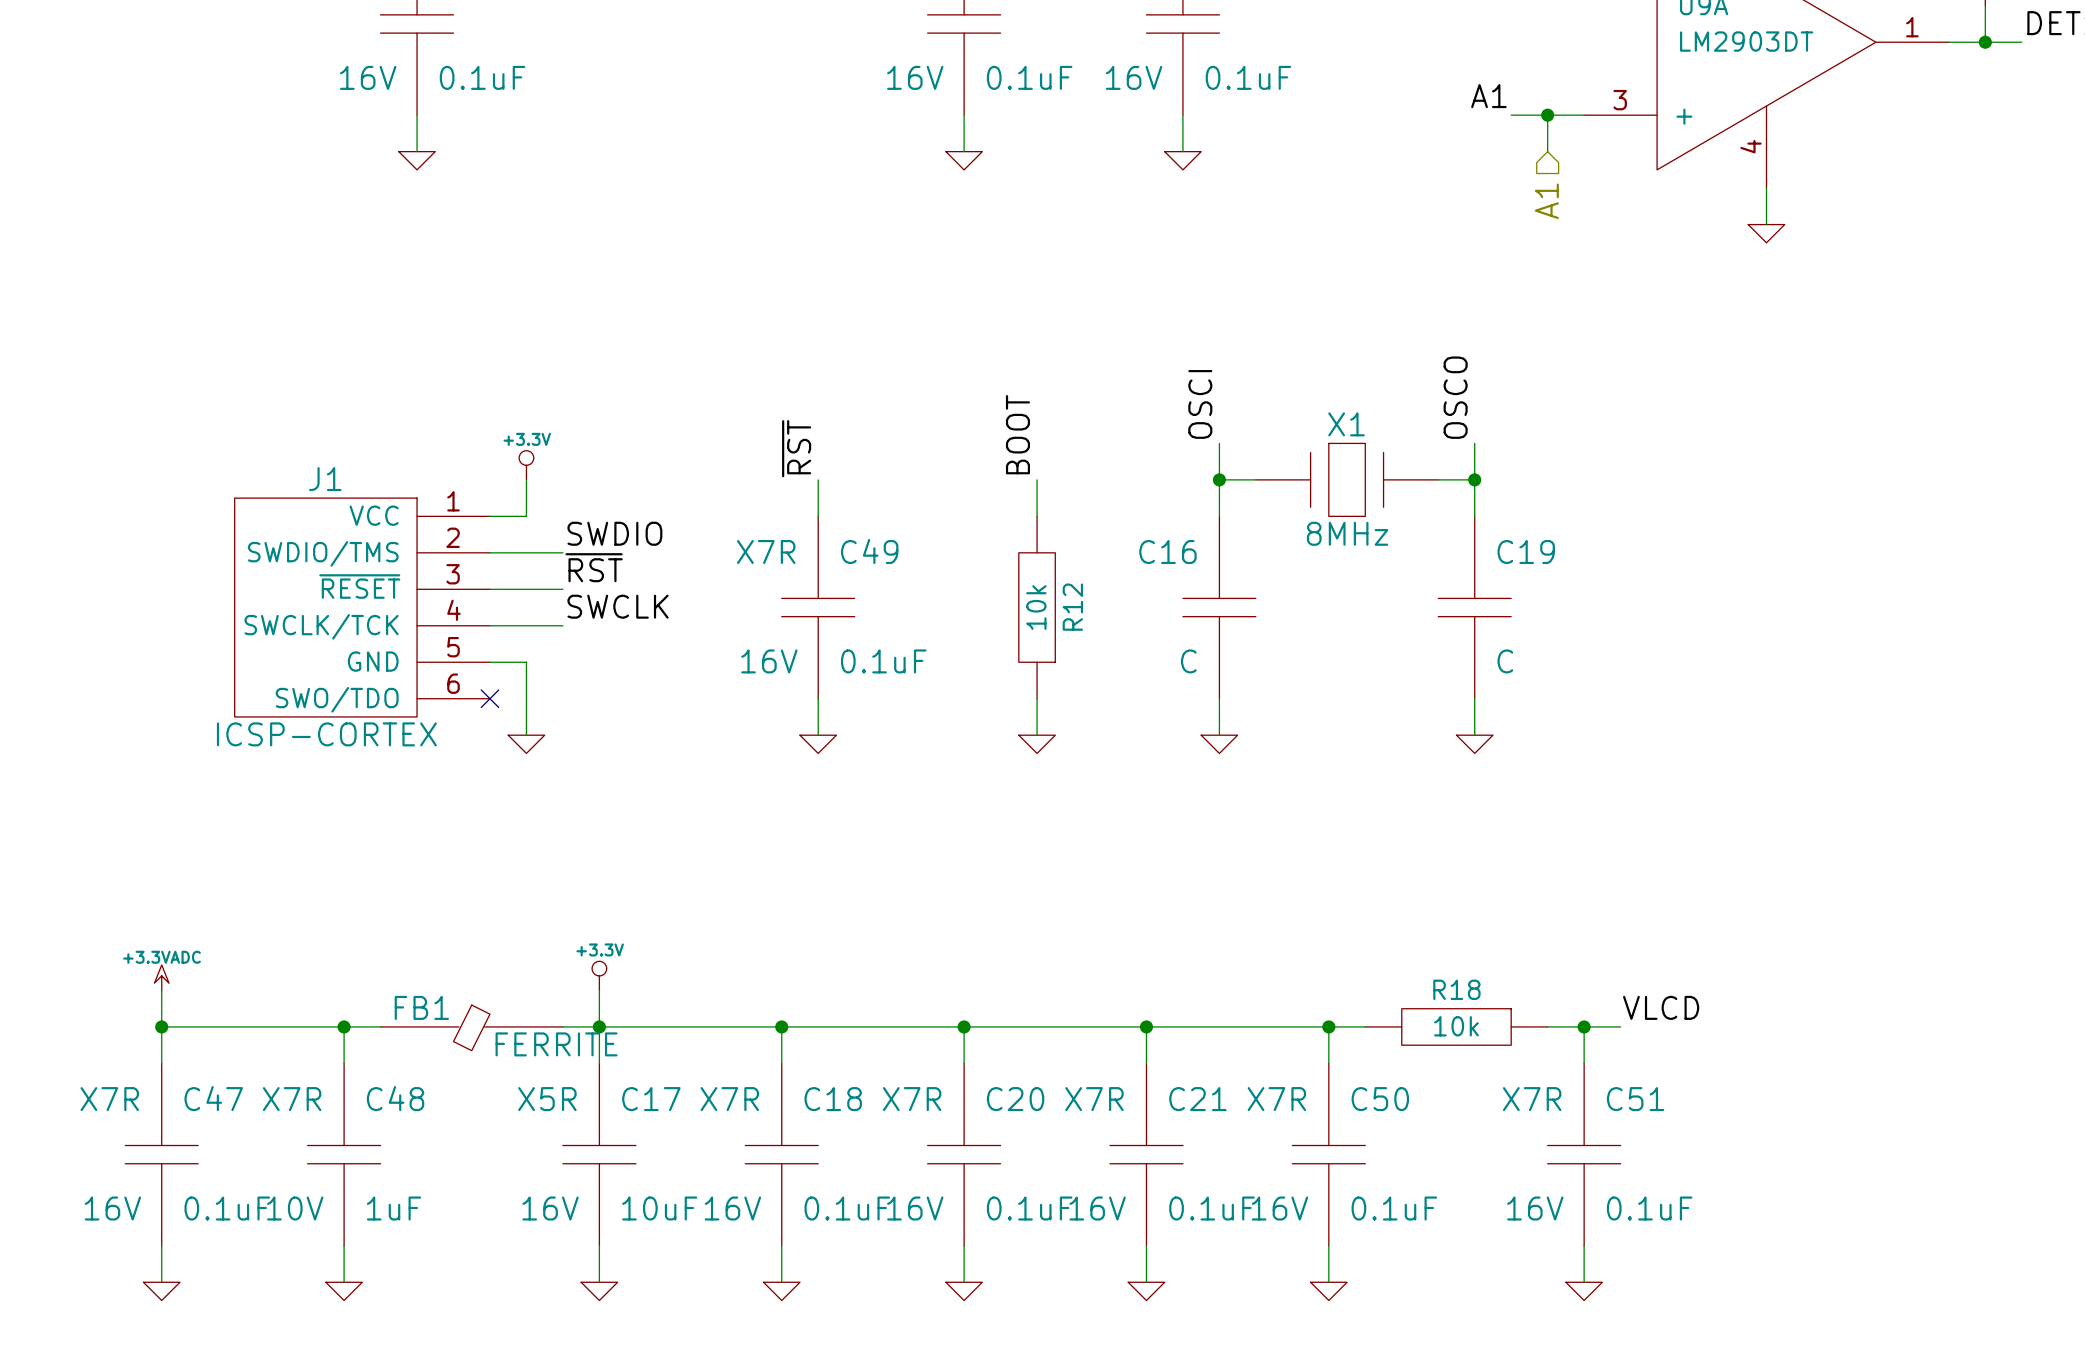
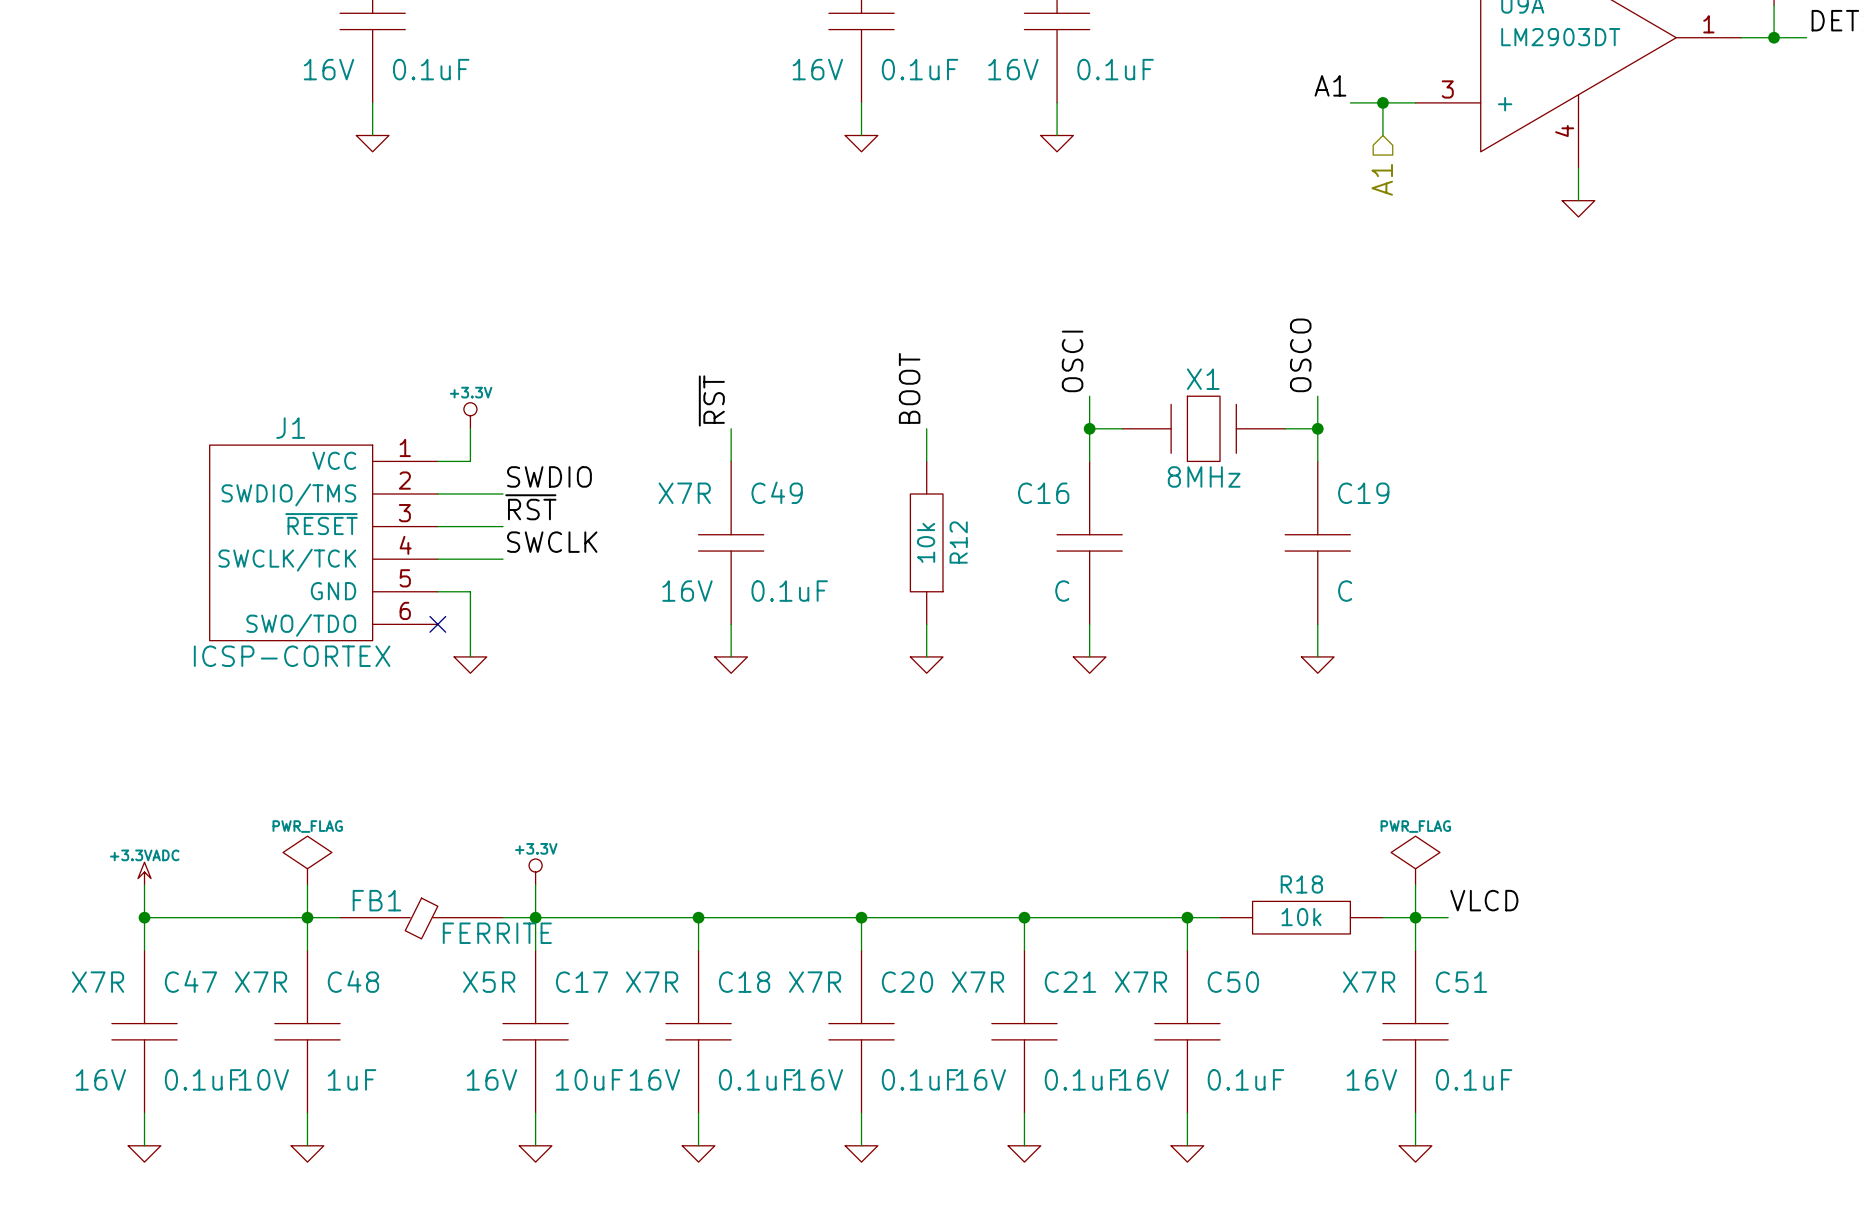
power symbol: none -> PWR_FLAG (307, 860)
power symbol: none -> PWR_FLAG (1415, 860)
wire: none -> (307, 885) (307, 917)
wire: none -> (1415, 885) (1415, 917)

